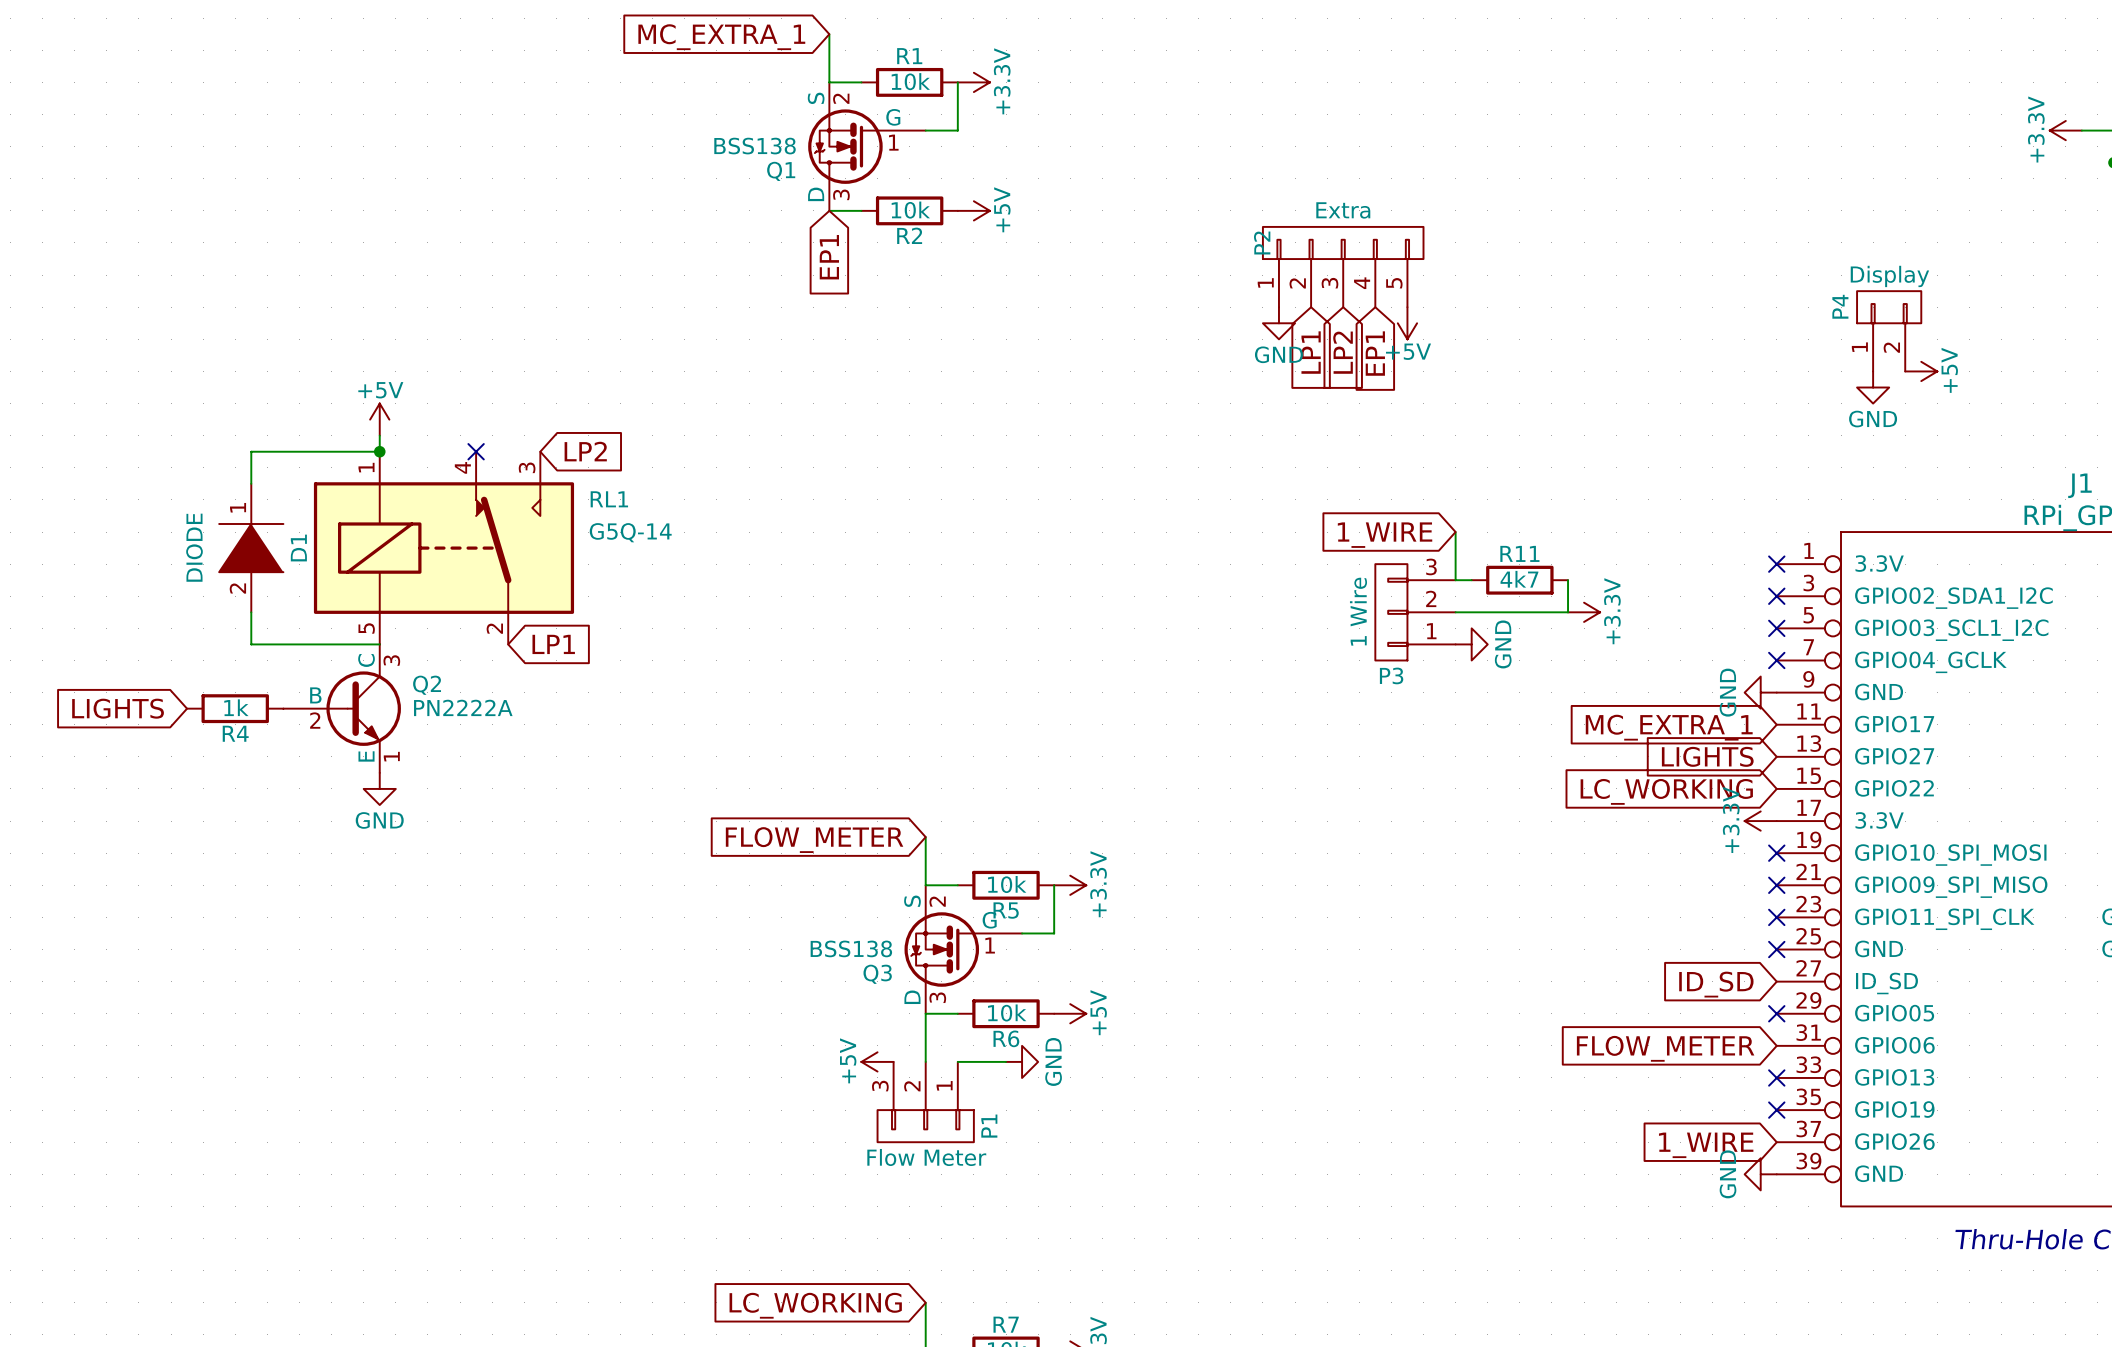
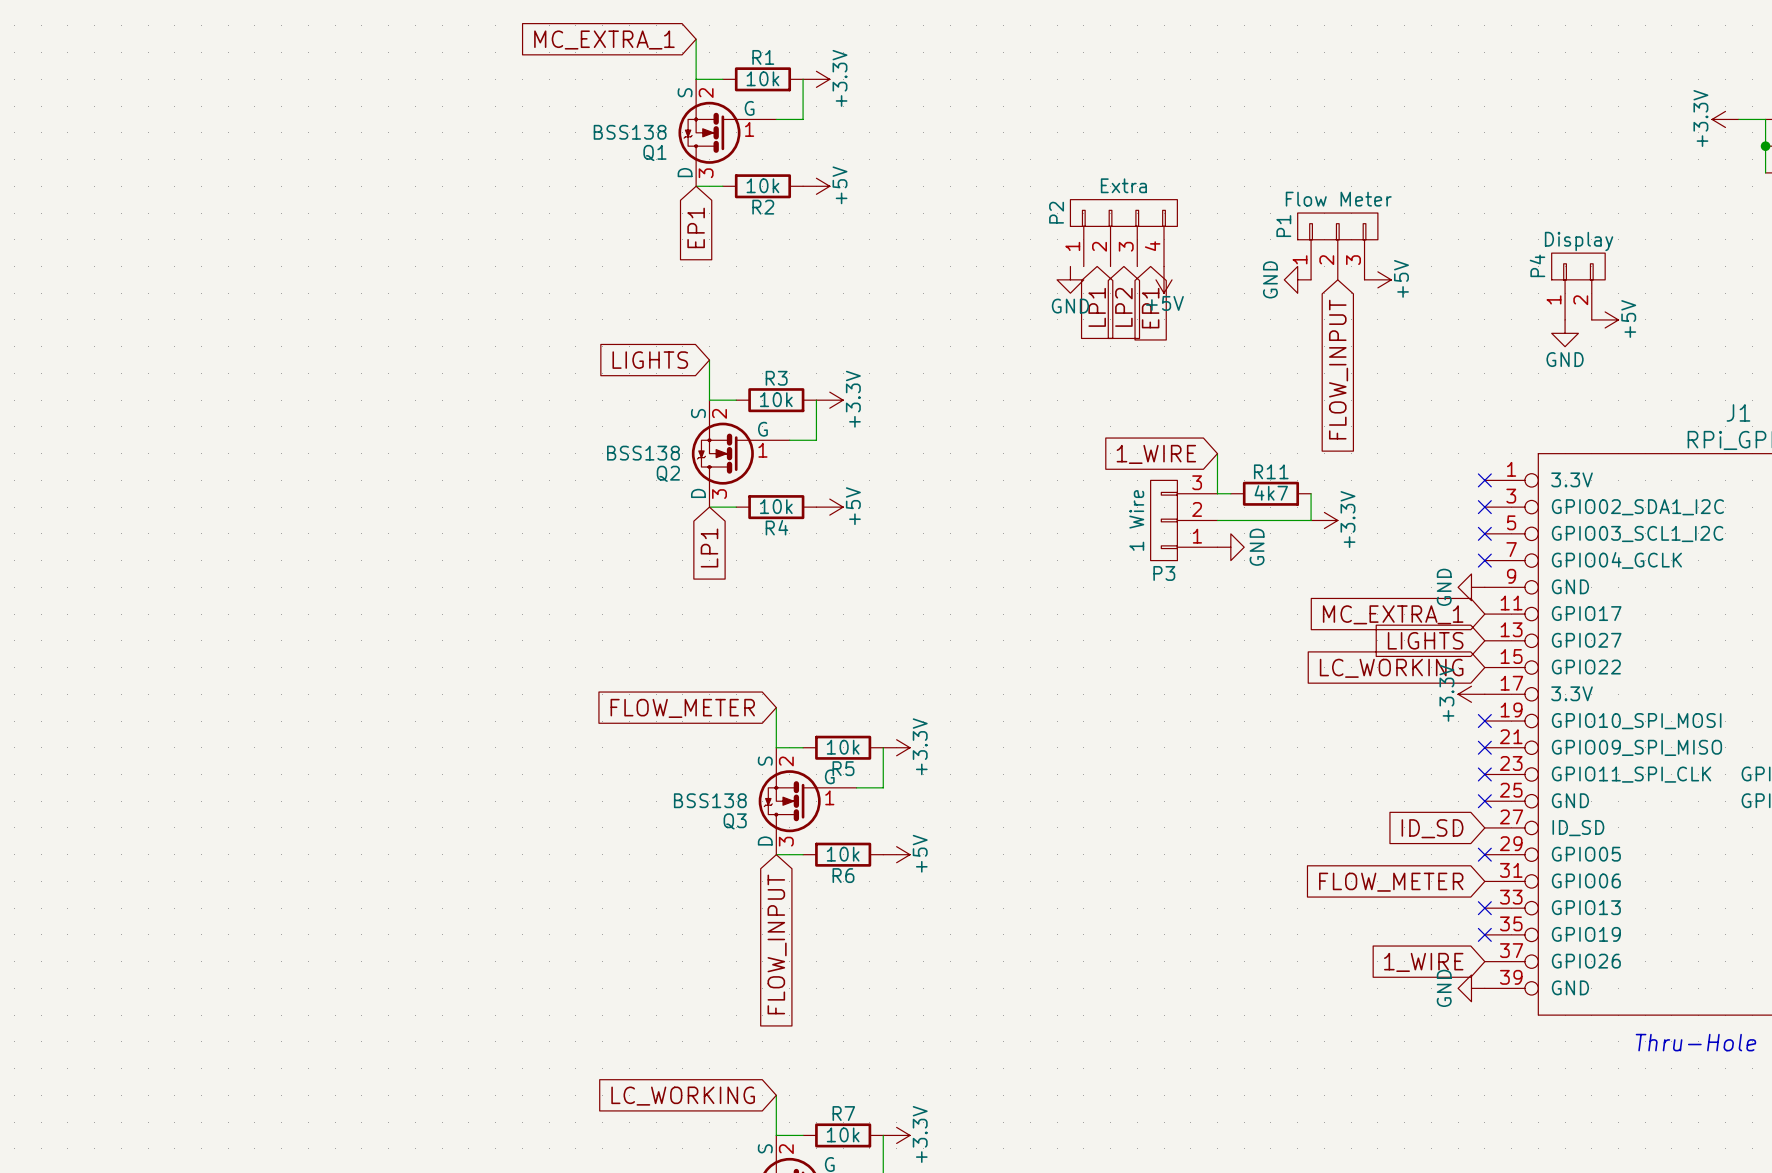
P2 symbol: [1262, 226, 1424, 308] -> [1070, 199, 1178, 267]
power symbol position: +5V (1407, 323) -> +5V (1164, 279)
power symbol: none -> GND (1297, 279)
power symbol: none -> +5V (1377, 279)
power symbol: +5V (379, 419) -> none
global label: none -> LIGHTS (650, 360)
wire: none -> (709, 360) (709, 400) (736, 400)
global label: none -> FLOW_INPUT (1338, 369)
wire: (379, 435) (379, 451) (251, 451) (251, 483) -> none
junction: (379, 451) -> none
no-connect mark: (476, 451) -> none
global label: LP2 (585, 451) -> none
R3: none -> 10k (776, 400)
wire: none -> (816, 400) (816, 440) (789, 440)
power symbol: none -> +3.3V (829, 400)
D1: DIODE (251, 548) -> none
RL1: G5Q-14 (443, 548) -> none
wire: none -> (709, 507) (736, 507)
power symbol: none -> +5V (829, 507)
wire: (251, 612) (251, 644) (379, 644) -> none
global label: none -> LP1 (709, 547)
Q2 symbol: [283, 644, 401, 773] -> [691, 400, 790, 508]
global label: LP1 (553, 644) -> none
Q2 name position: Q2 (427, 685) -> Q2 (668, 473)
R4 value: 1k (236, 707) -> 10k (776, 506)
Q2 value: PN2222A (463, 707) -> BSS138 (643, 453)
global label: LIGHTS (118, 708) -> none
R4 position: (235, 708) -> (776, 507)
power symbol: GND (379, 788) -> none
wire: (925, 1013) (925, 1061) -> none
power symbol: +5V (877, 1061) -> none
wire: (957, 1061) (1006, 1061) -> none
power symbol: GND (1022, 1061) -> none
P1 position: (925, 1102) -> (1337, 246)
global label: none -> FLOW_INPUT (777, 944)
P1 rotation: 0° (925, 1126) -> 180° (1337, 226)

